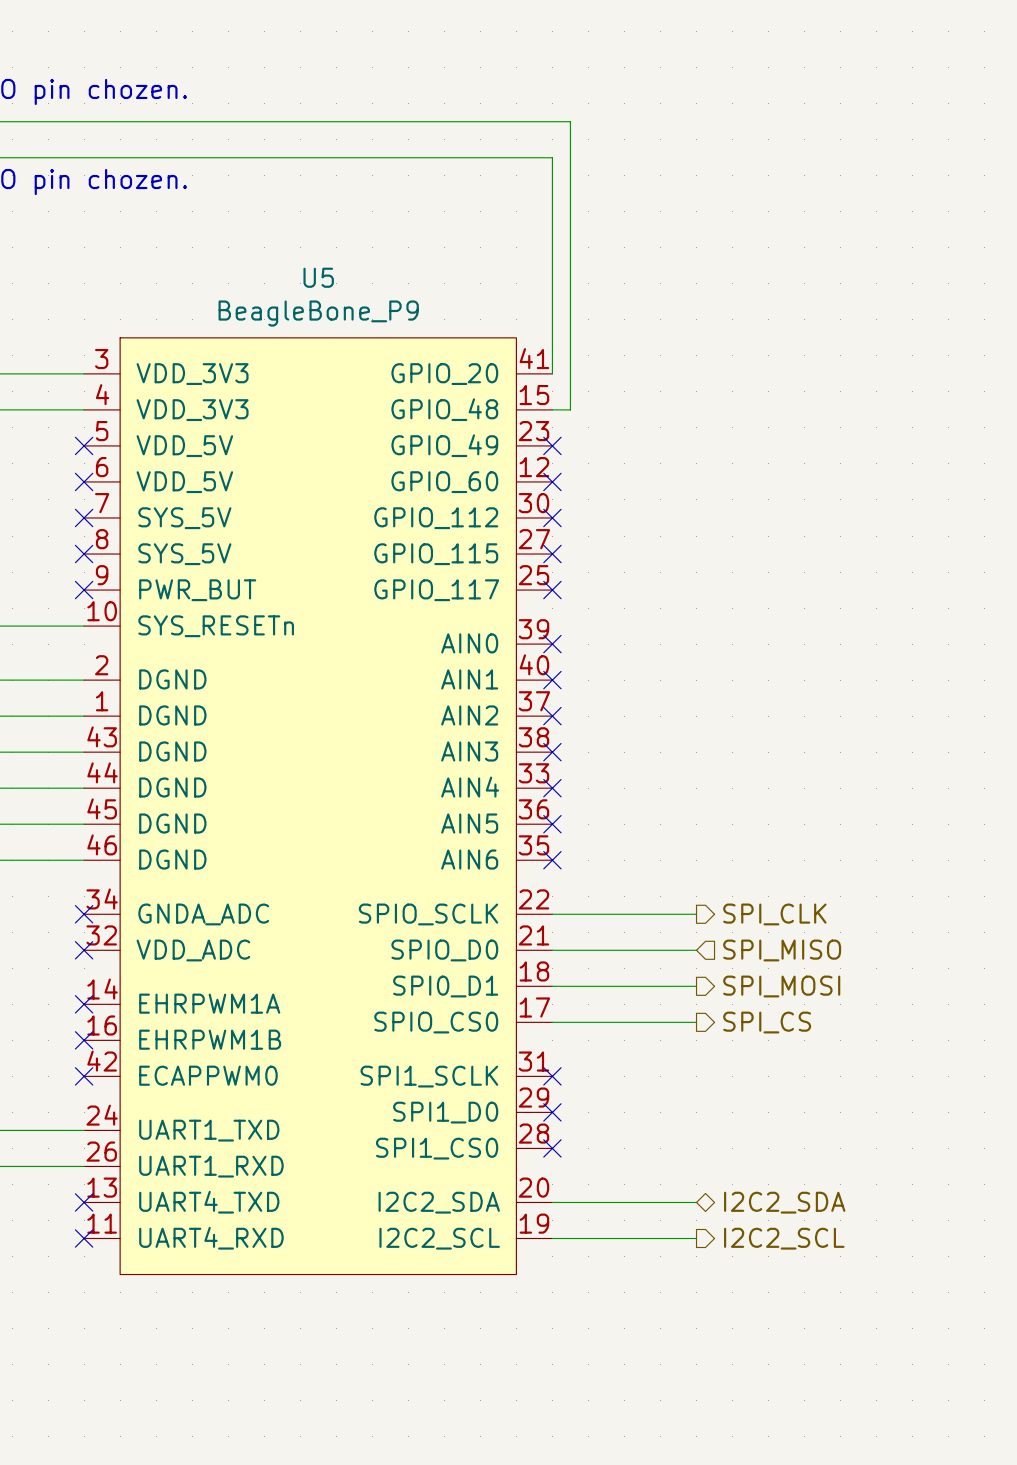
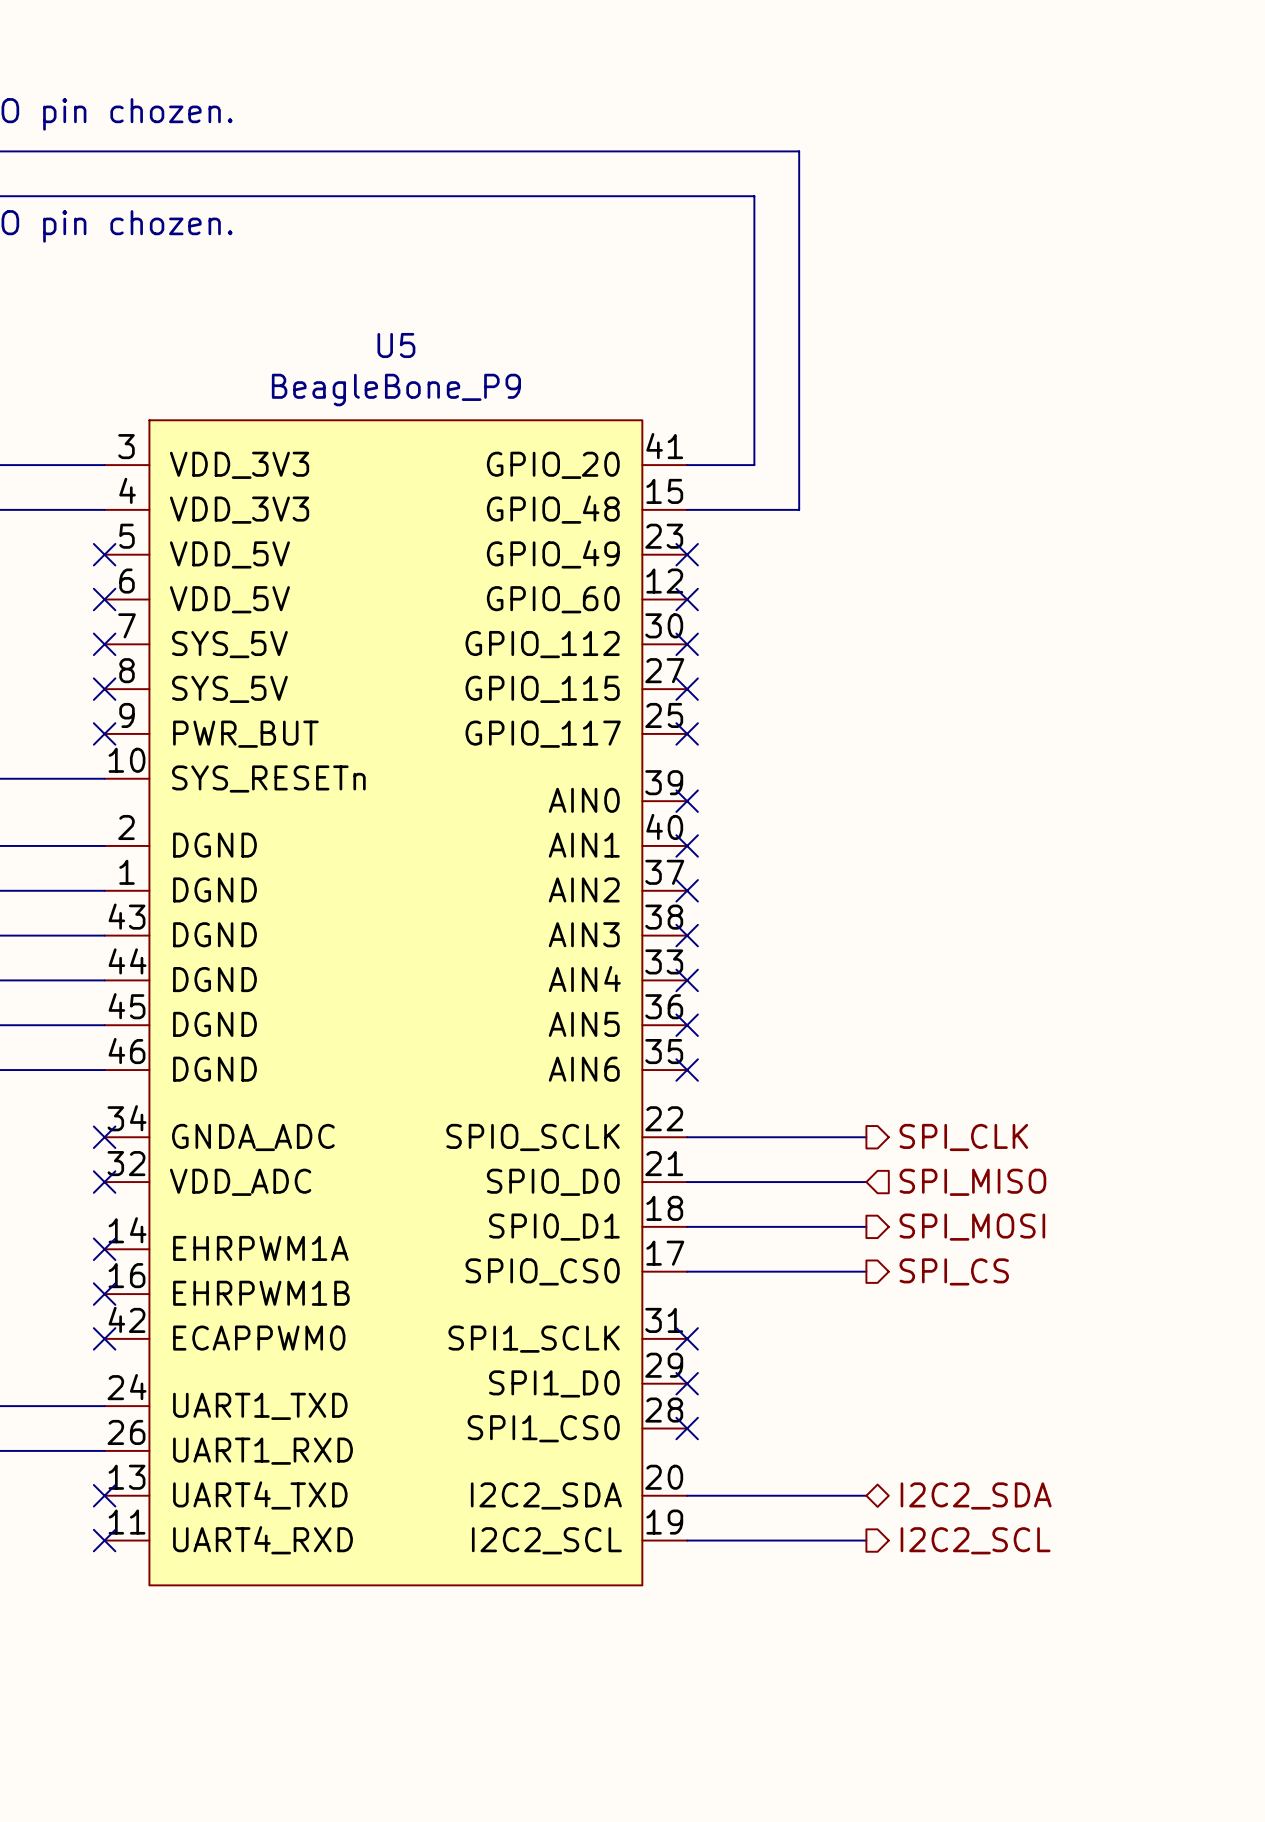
wire: (570, 121) (570, 409) -> (709, 151) (799, 151) (799, 509) (709, 509)
wire: (552, 157) (552, 373) -> (687, 196) (754, 196) (754, 465) (687, 465)

